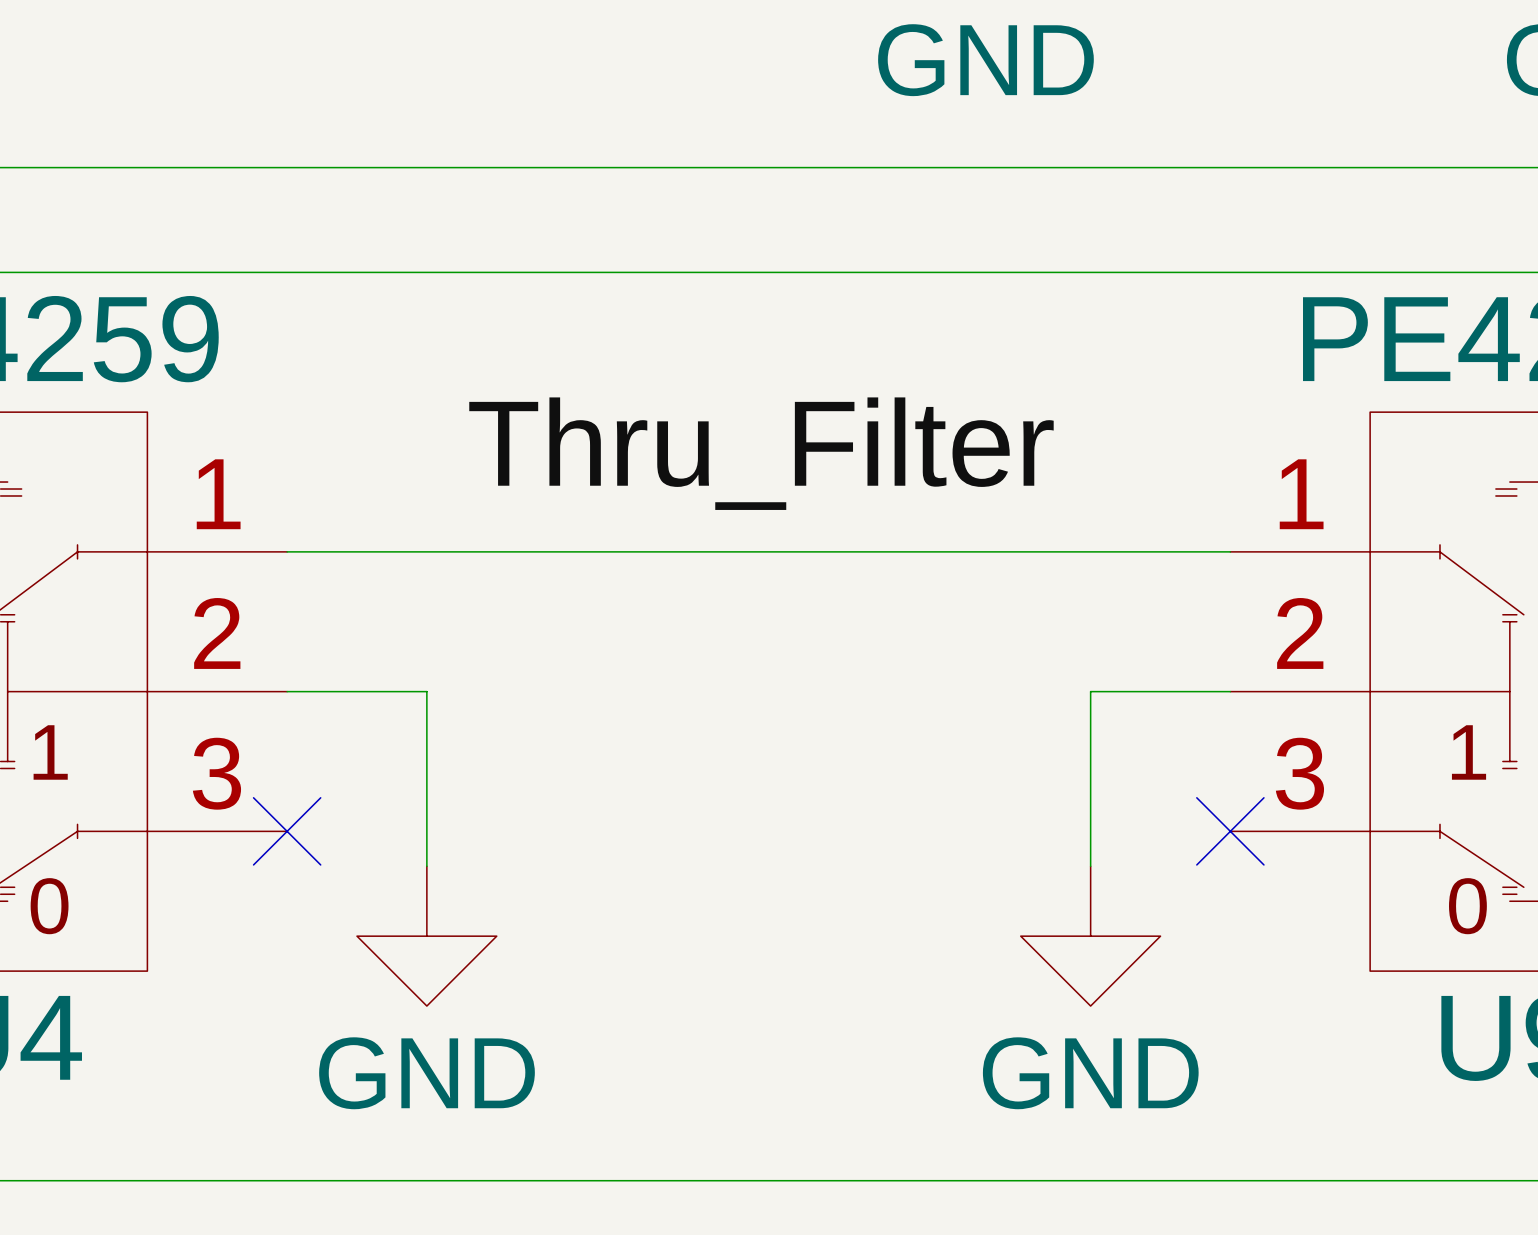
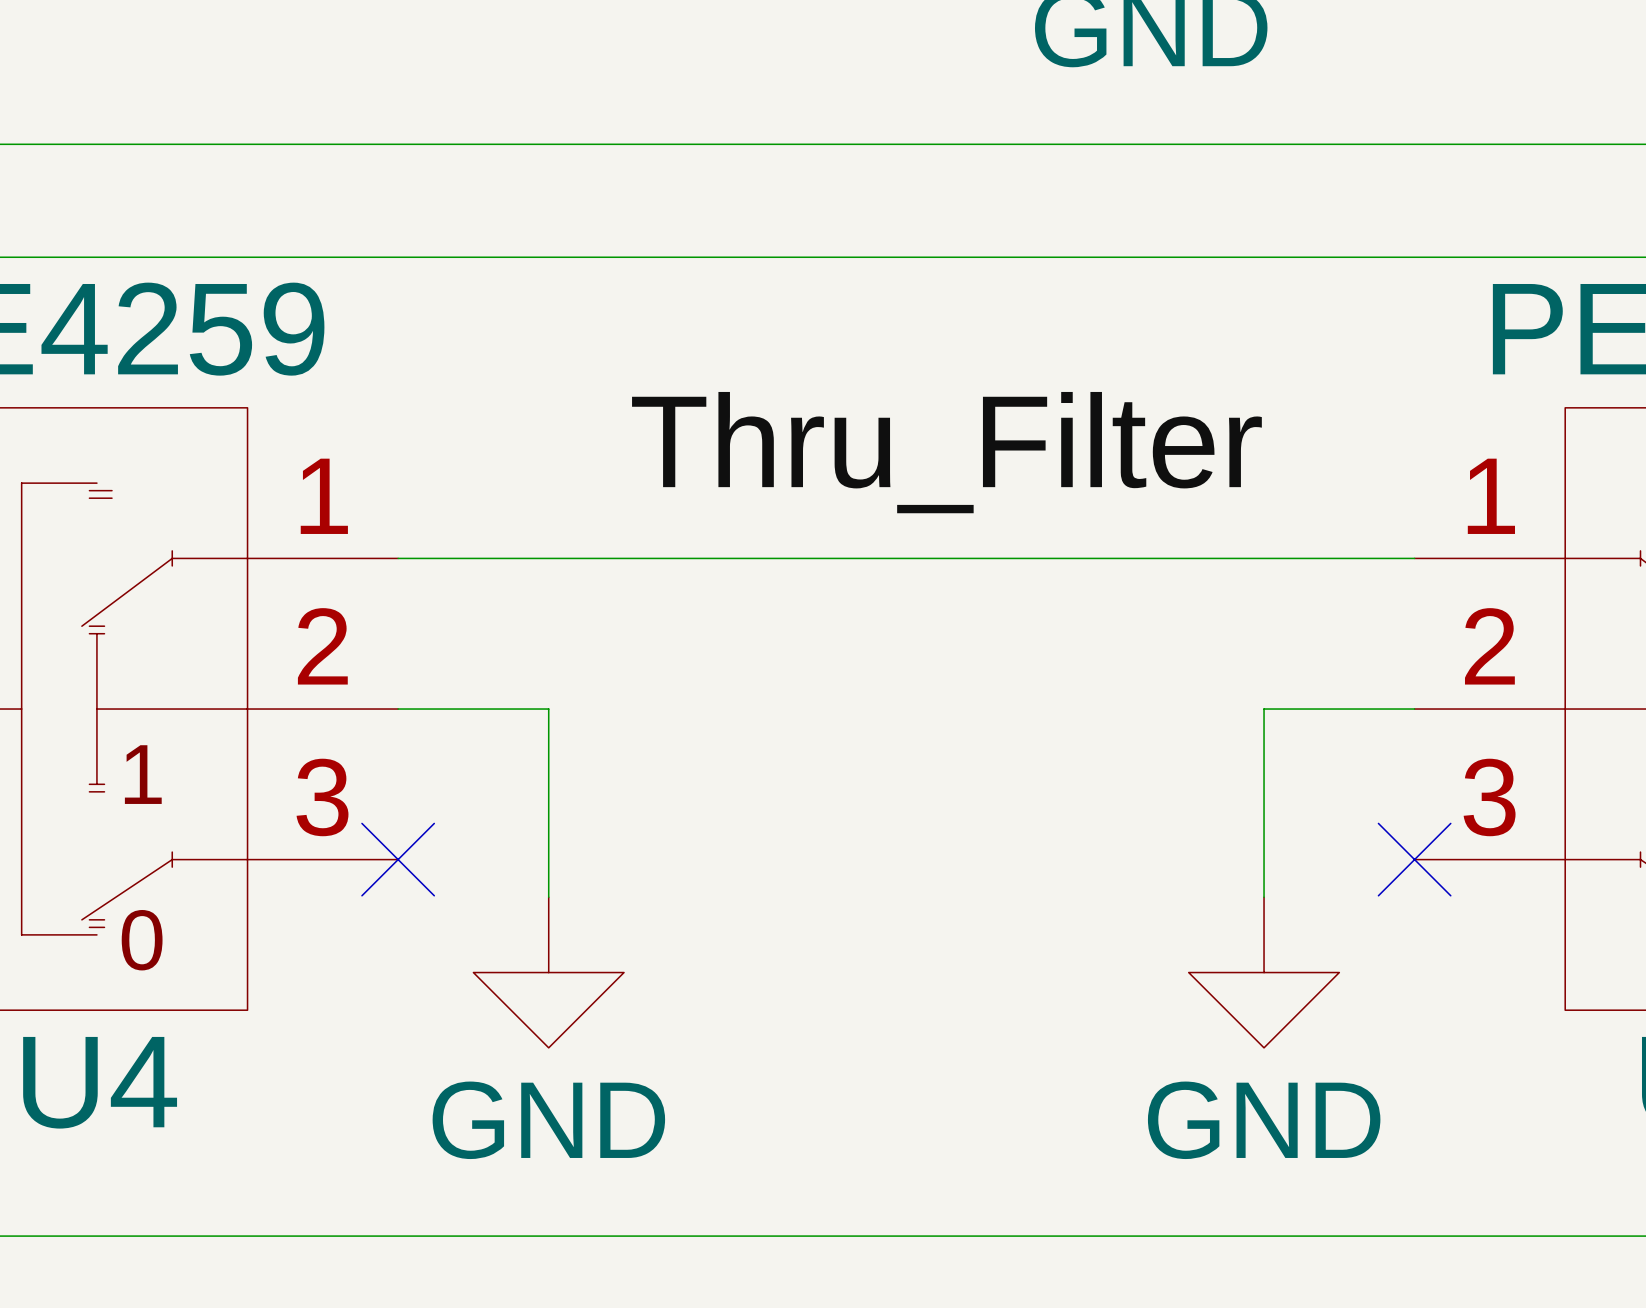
label position: Thru_Filter (761, 453) -> Thru_Filter (946, 452)

